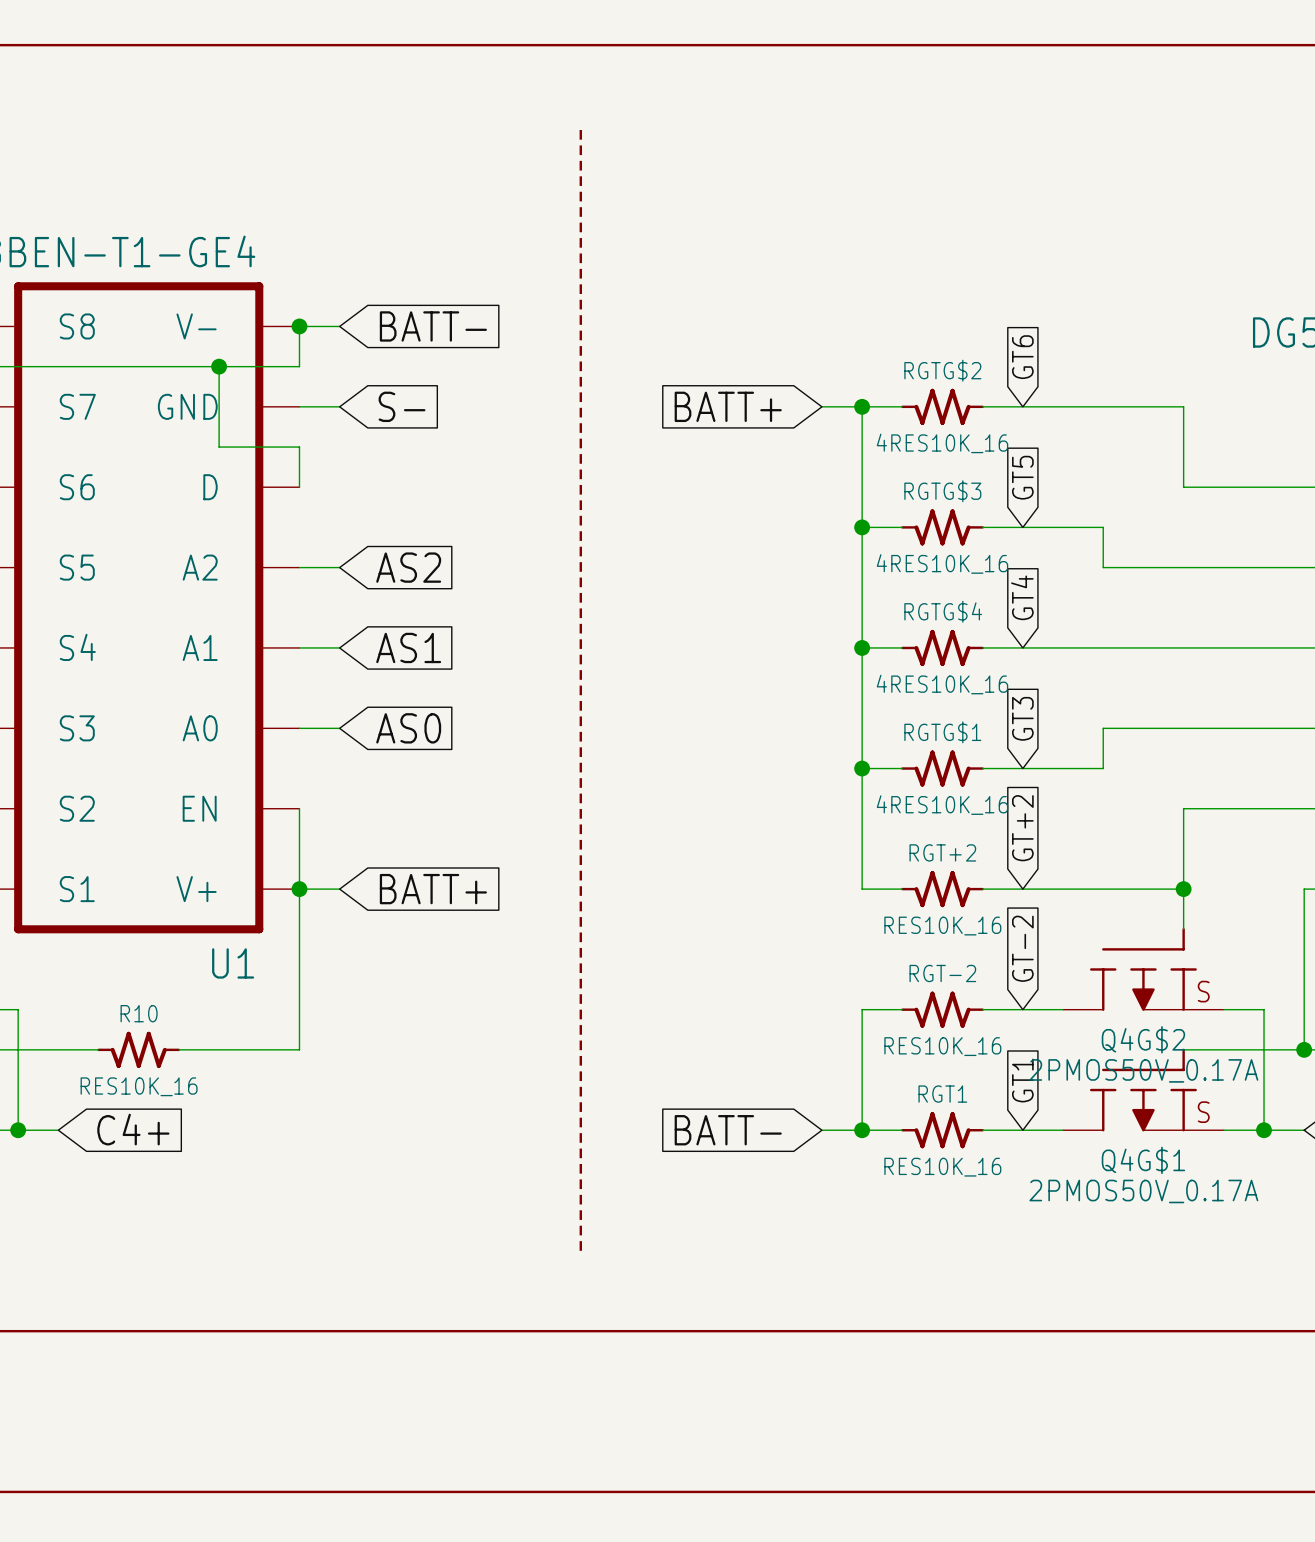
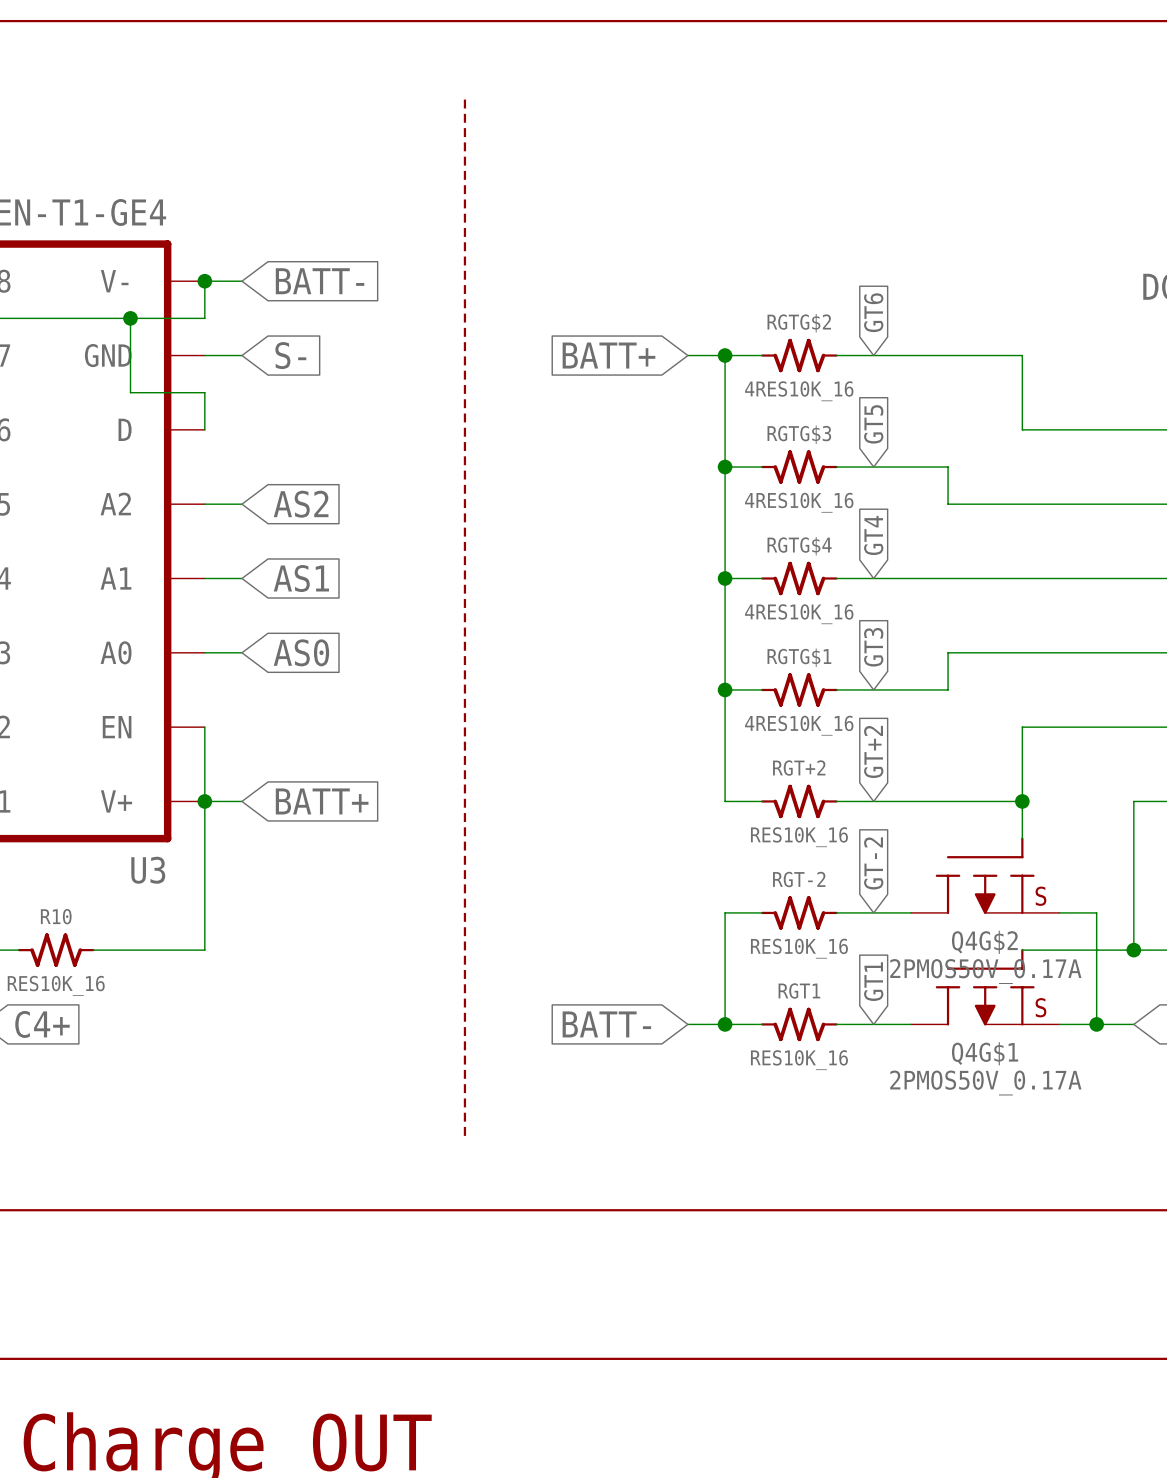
U1 name: U1 (233, 963) -> U3 (148, 870)

